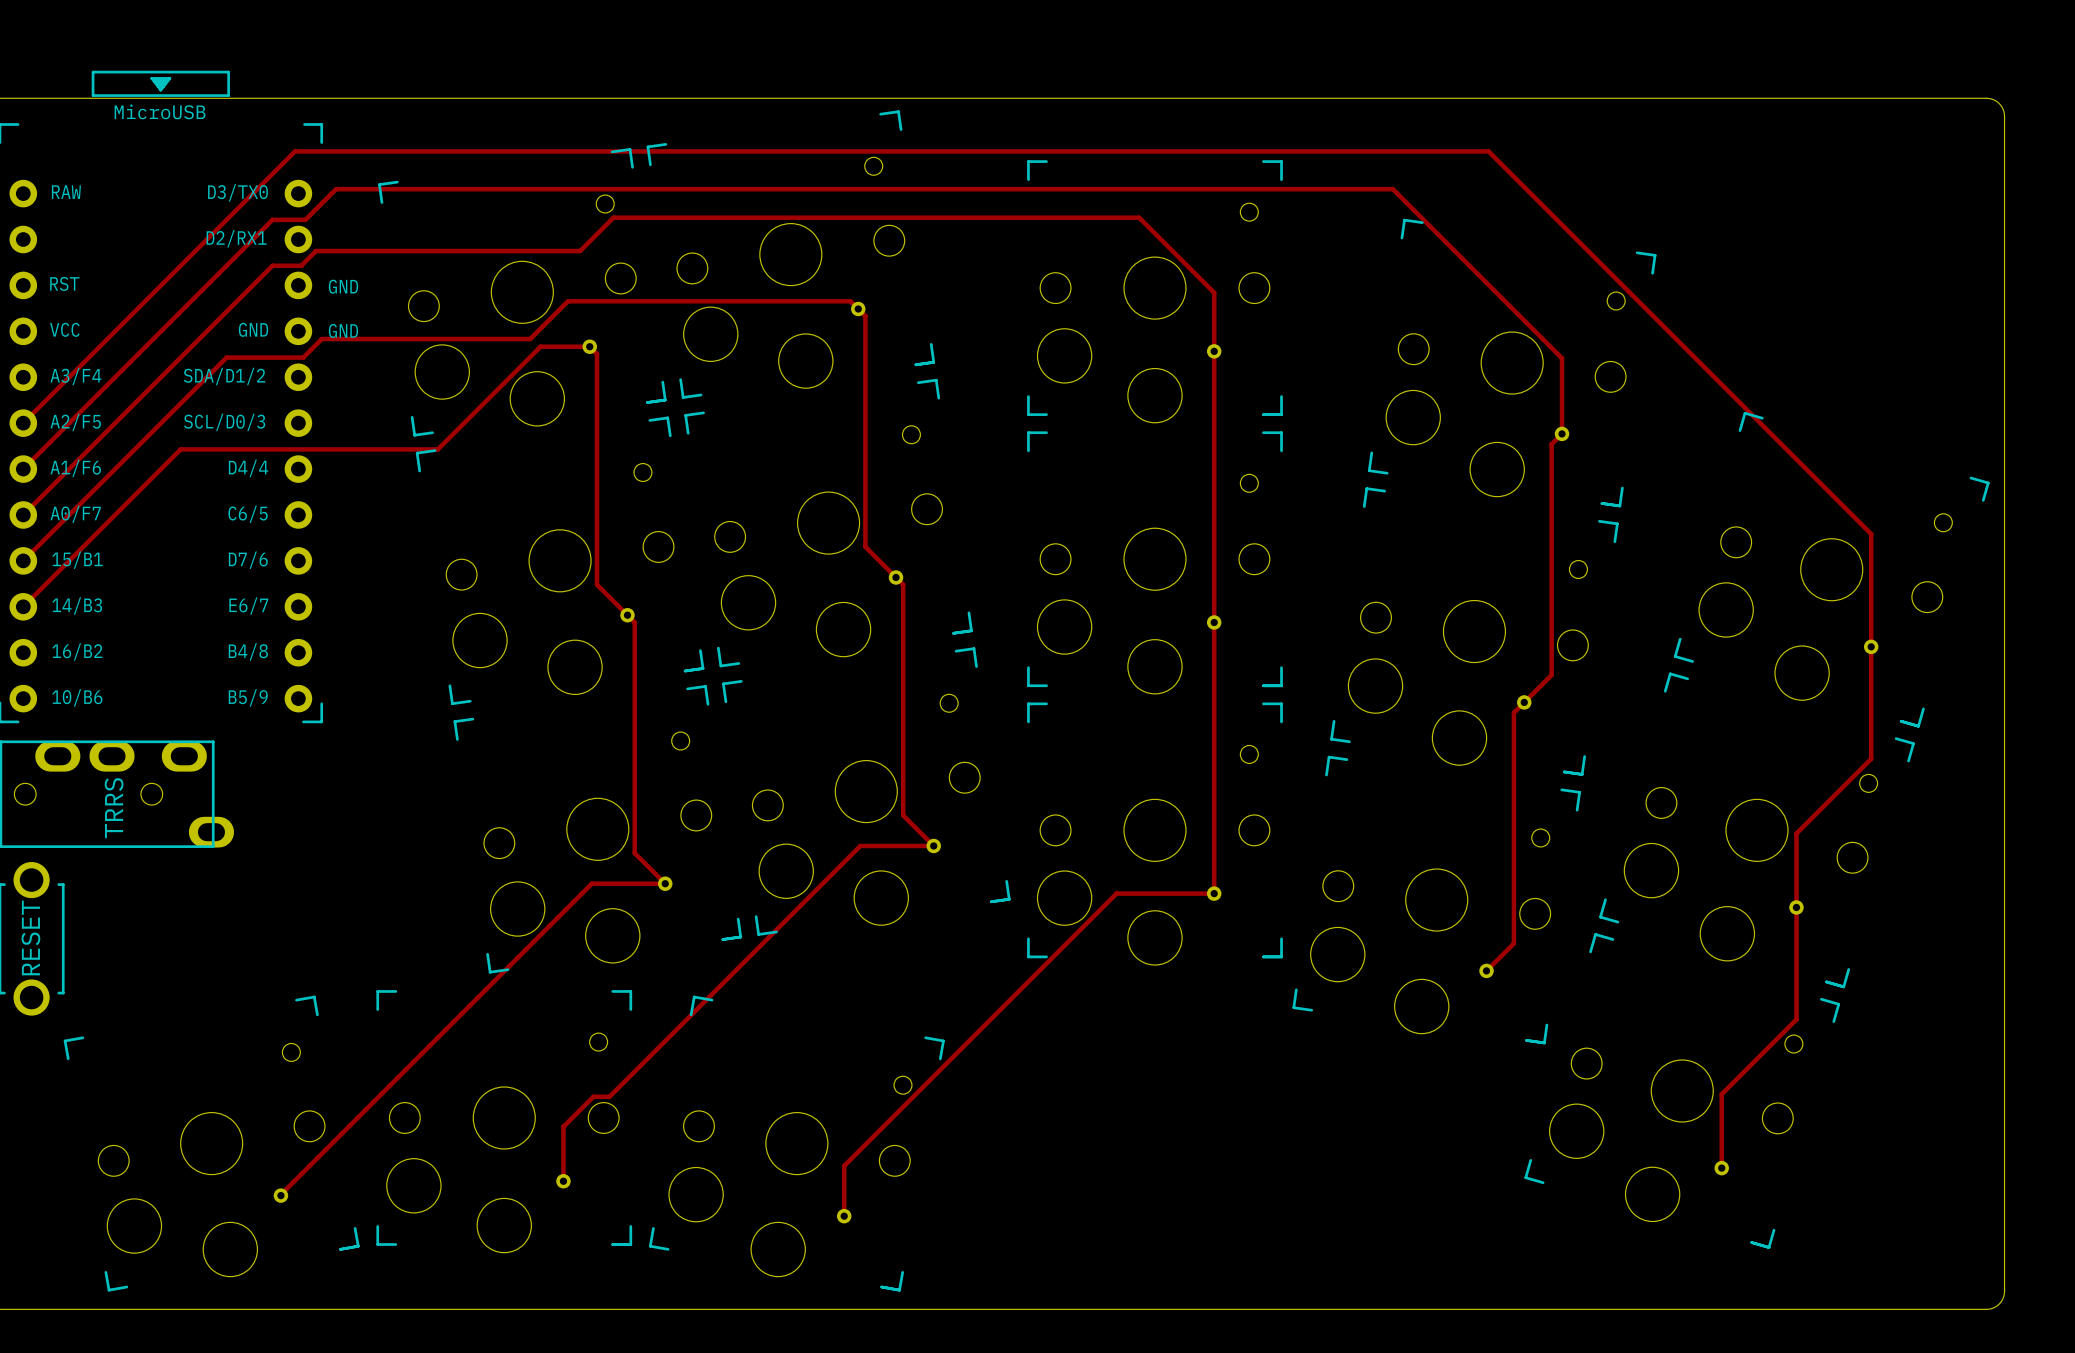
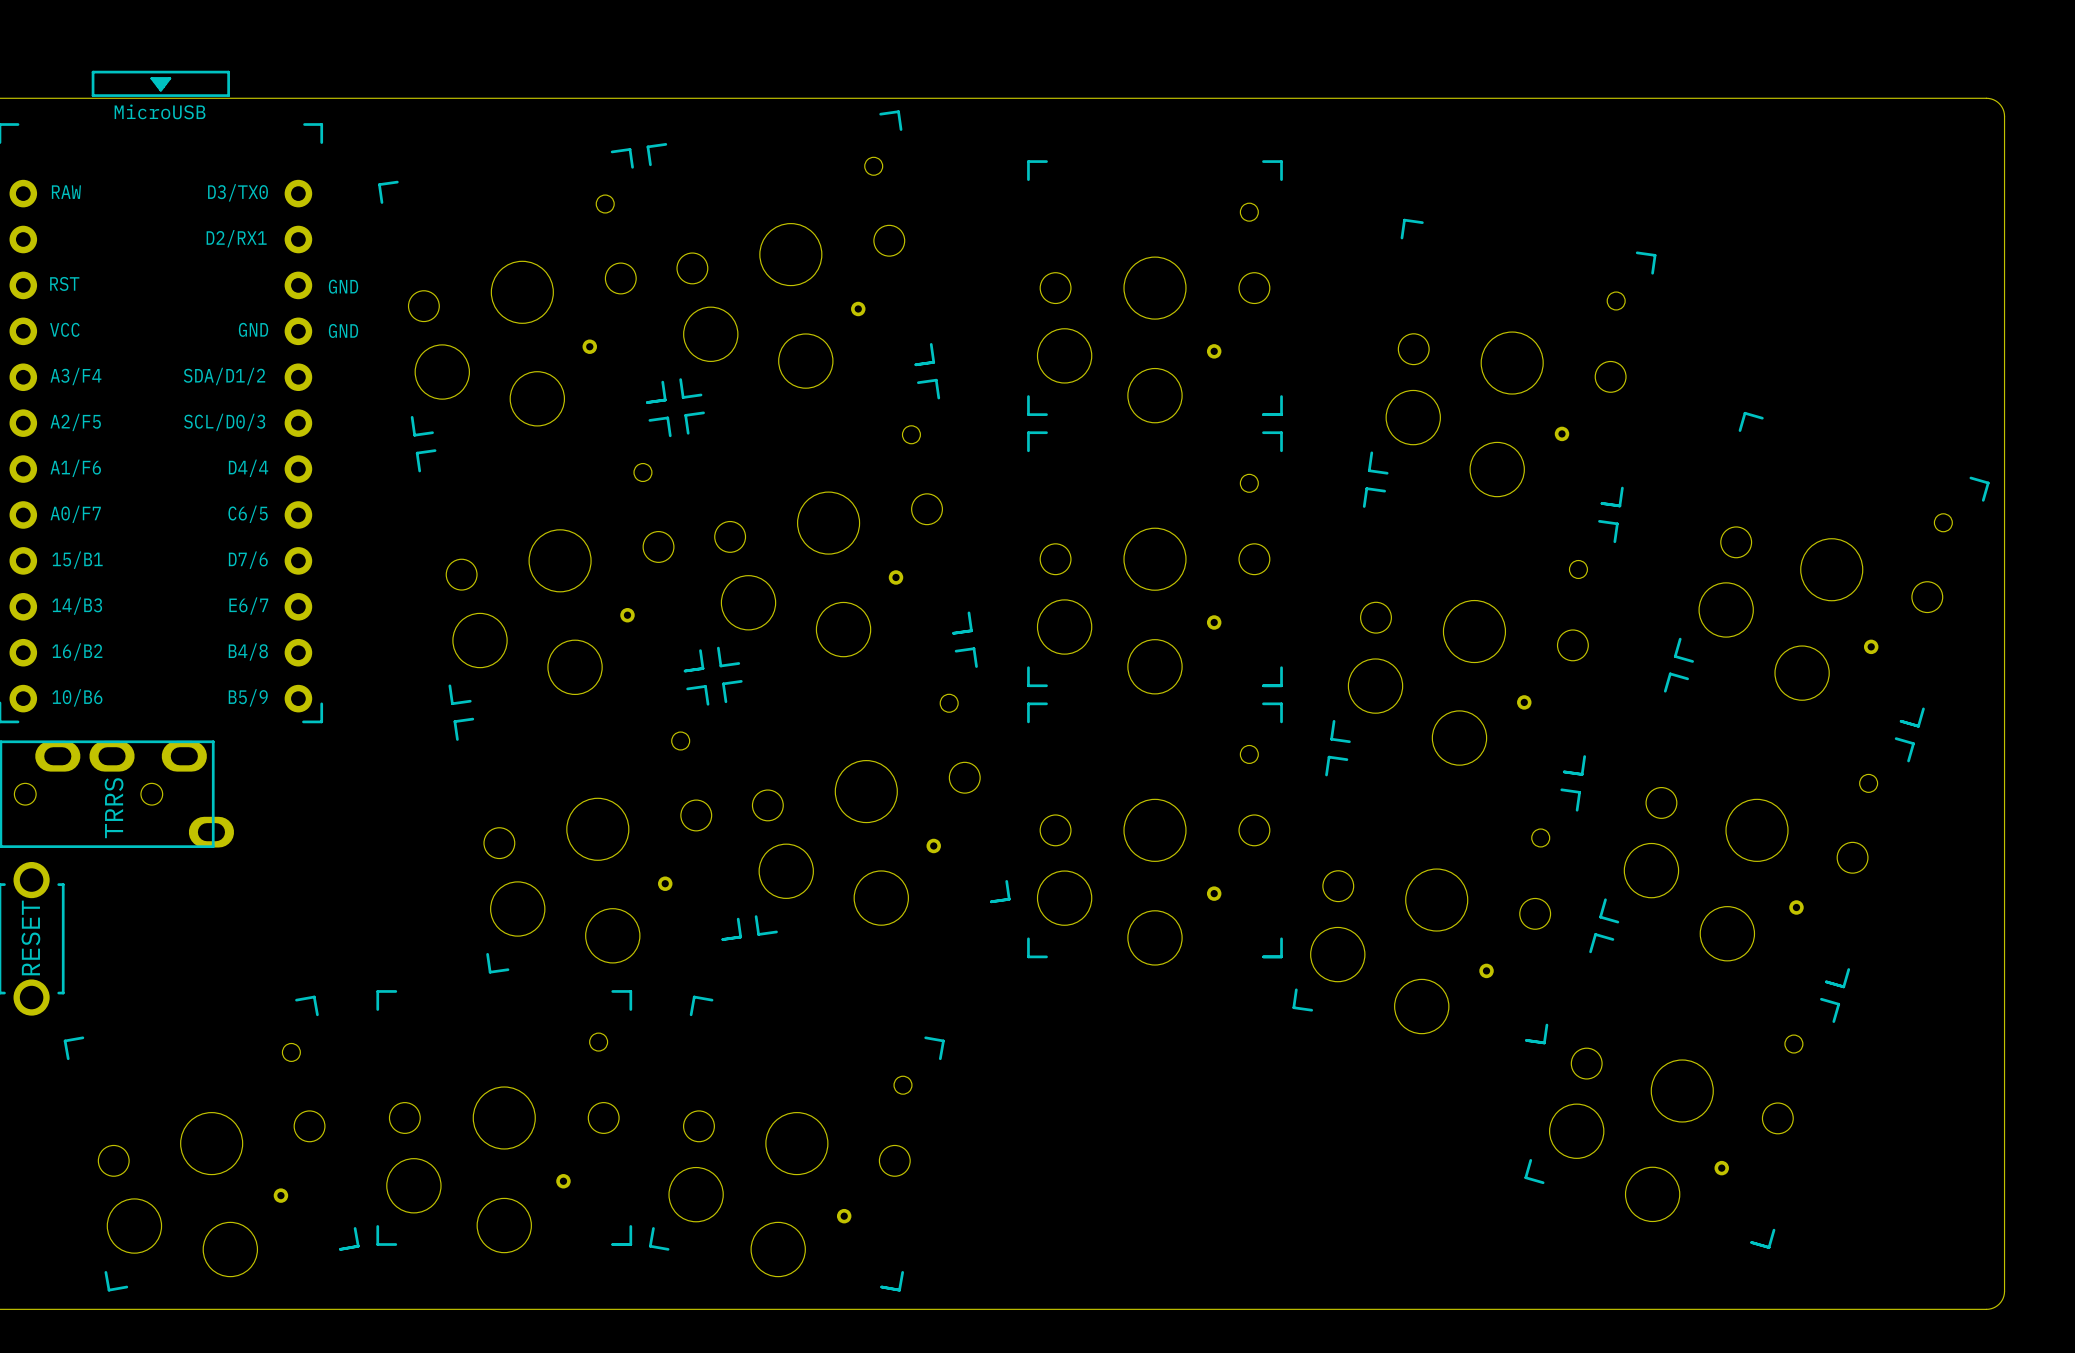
track: (23, 423) (295, 151) (1488, 151) (1871, 534) (1871, 758) (1796, 833) (1796, 1019) (1721, 1094) (1721, 1168) -> none
track: (23, 469) (272, 219) (305, 219) (336, 189) (1392, 189) (1562, 358) (1562, 433) (1551, 444) (1551, 675) (1513, 712) (1513, 943) (1486, 970) -> none
track: (23, 514) (272, 265) (301, 265) (315, 251) (580, 251) (613, 217) (1139, 217) (1214, 292) (1214, 893) (1116, 893) (844, 1165) (844, 1216) -> none
track: (23, 560) (226, 357) (303, 357) (321, 339) (530, 339) (567, 301) (850, 301) (865, 316) (865, 546) (903, 584) (903, 815) (933, 845) (860, 845) (609, 1096) (593, 1096) (563, 1126) (563, 1181) -> none
track: (23, 606) (180, 449) (437, 449) (540, 346) (589, 346) (597, 353) (597, 584) (634, 622) (634, 853) (665, 883) (591, 883) (280, 1195) -> none

